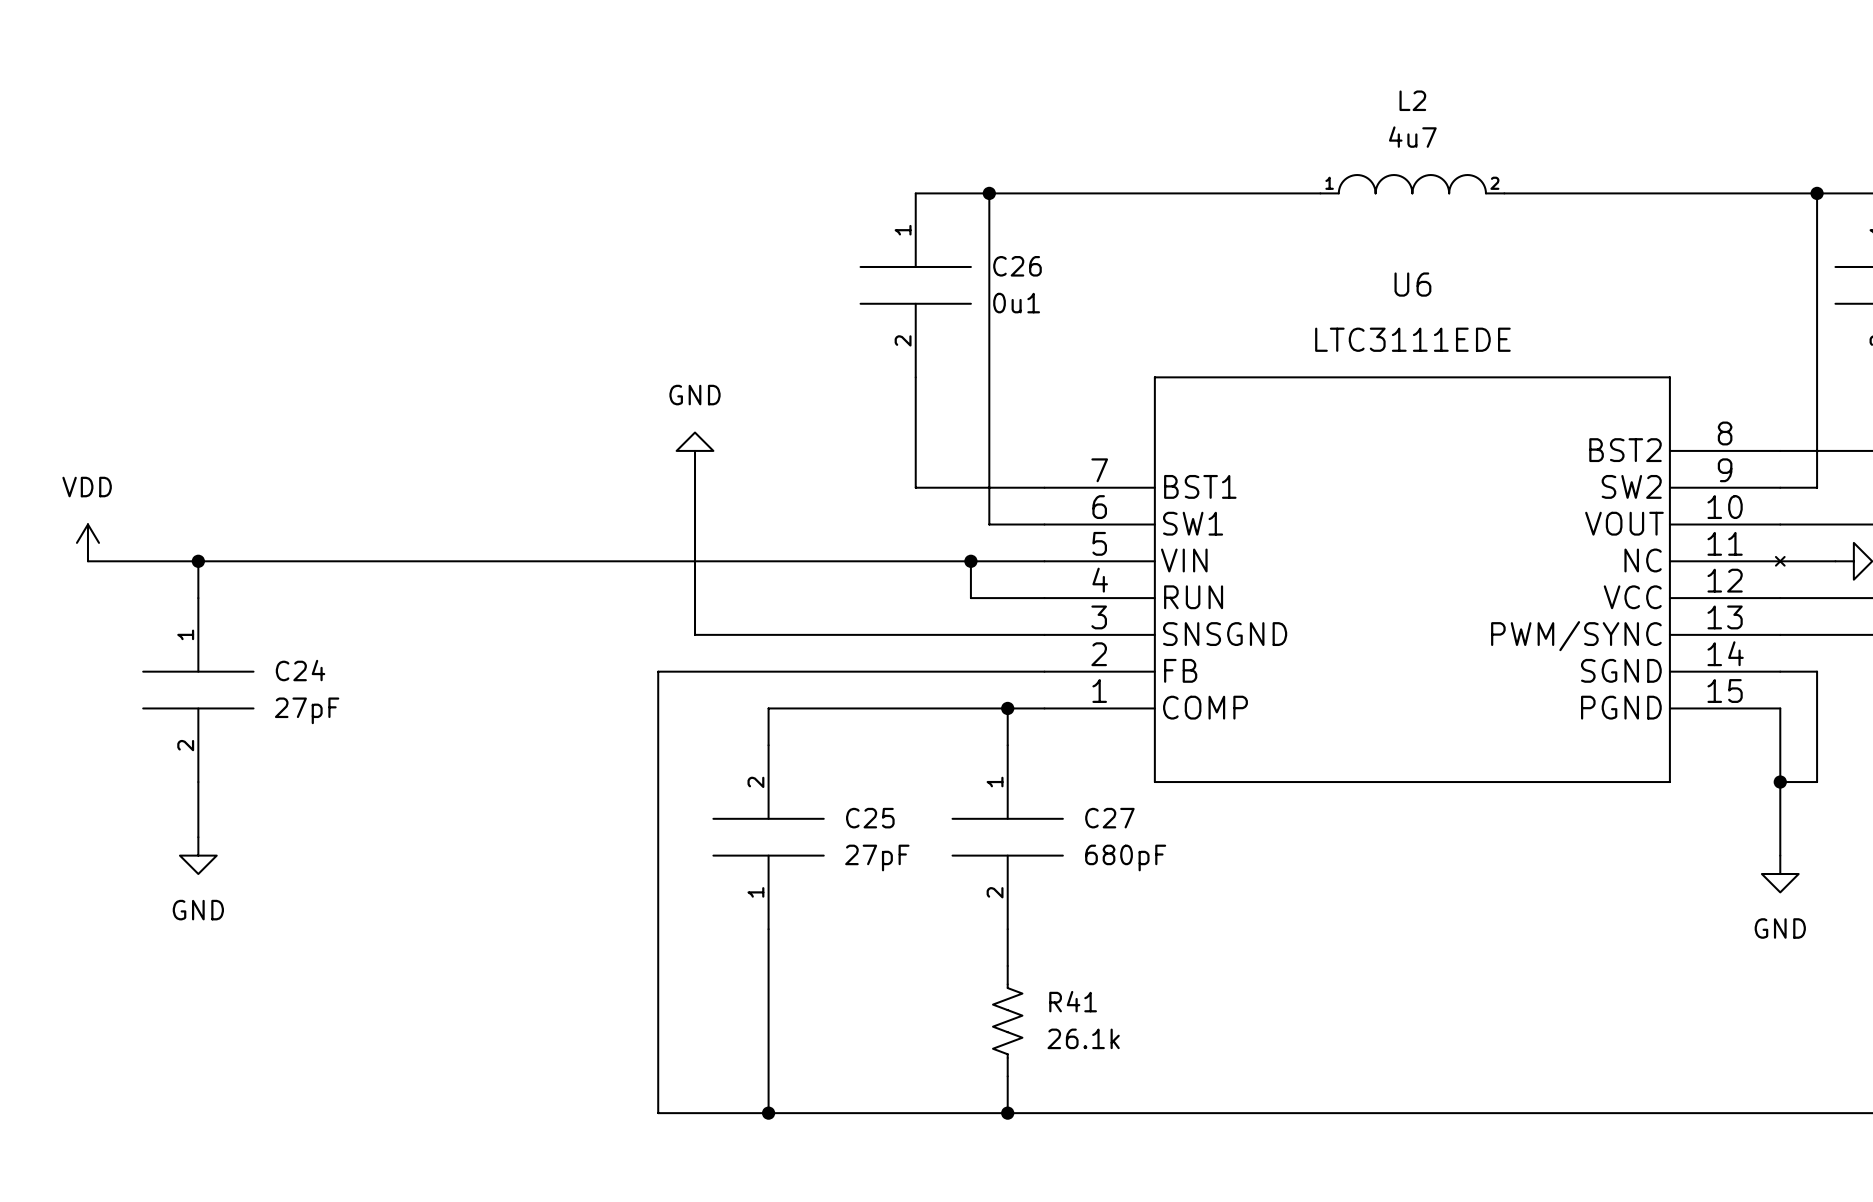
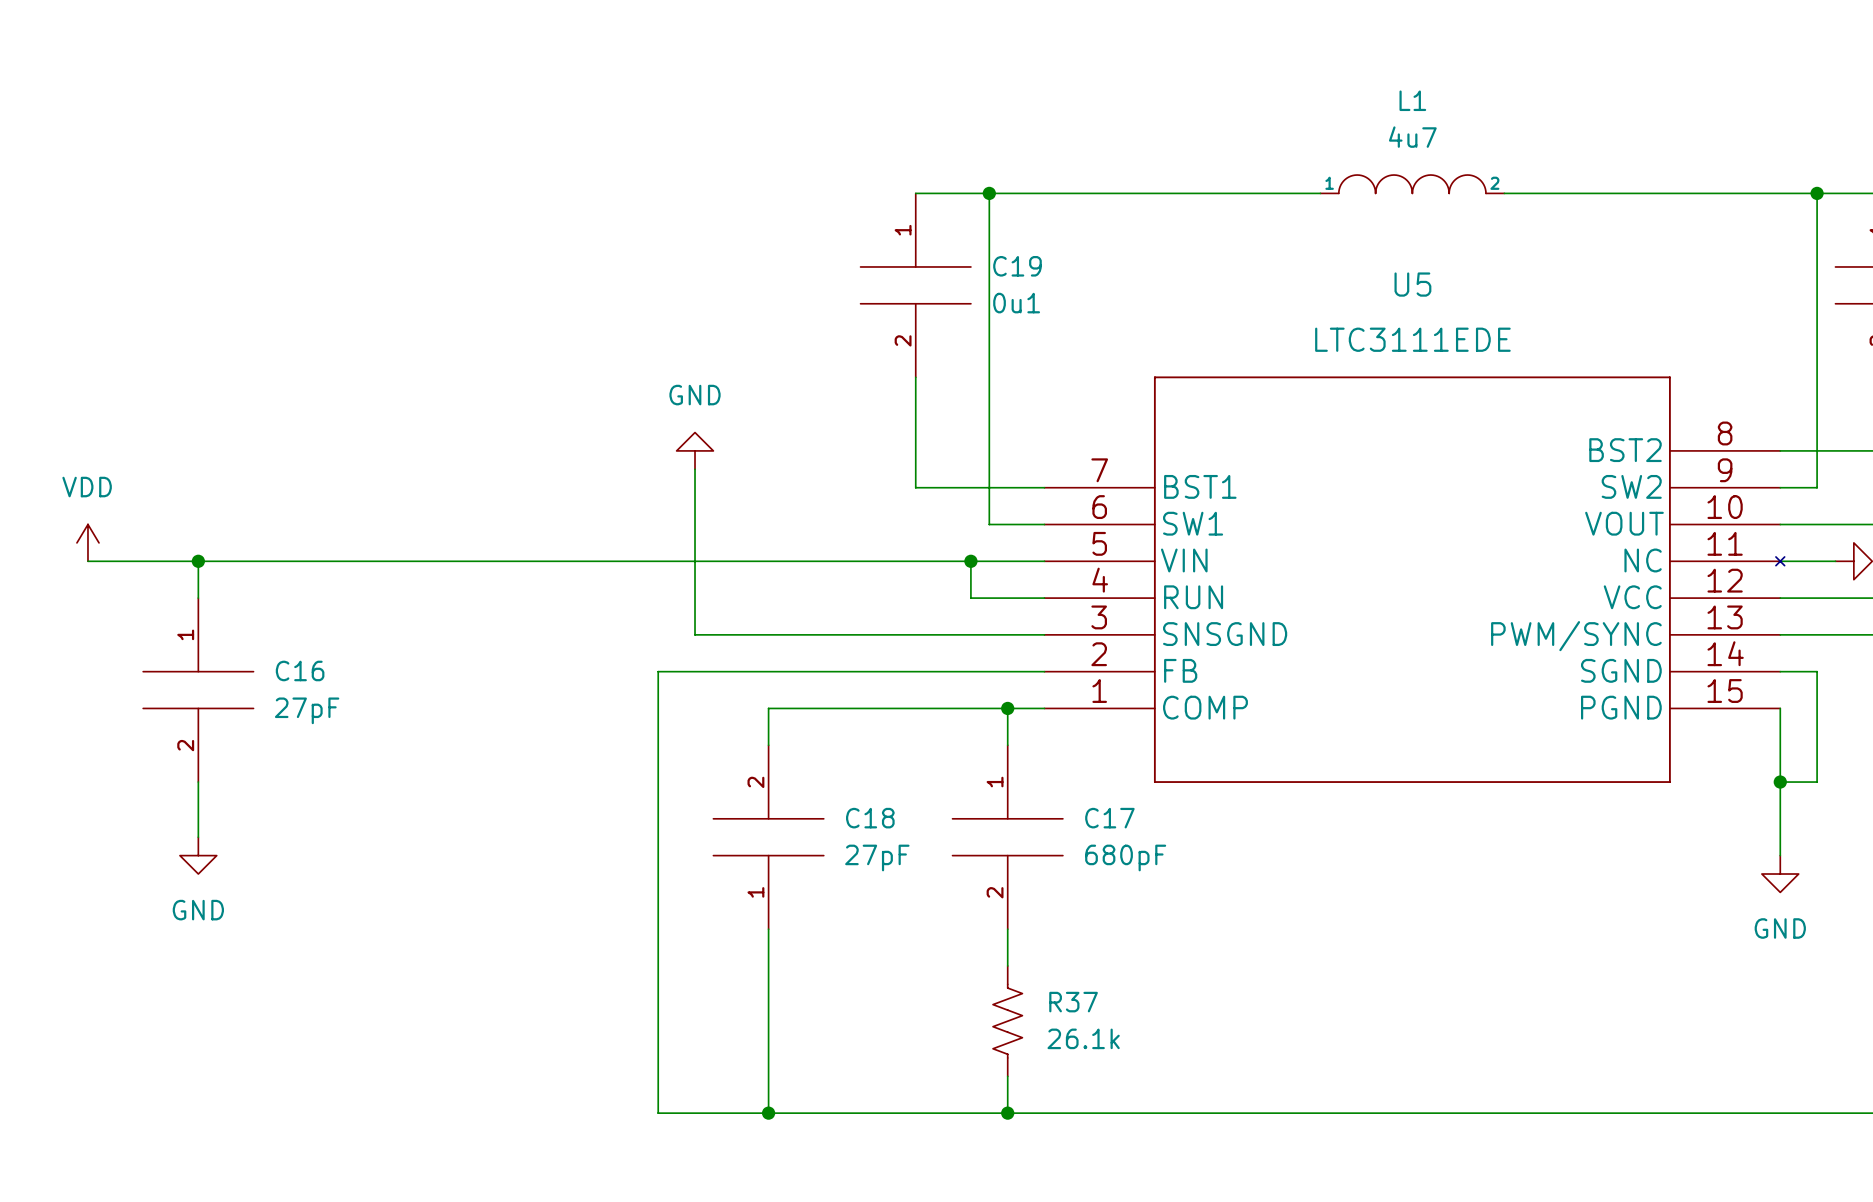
L2 name: L2 (1412, 100) -> L1 (1412, 100)
C26 name: C26 (1017, 266) -> C19 (1017, 266)
U6 name: U6 (1412, 284) -> U5 (1412, 284)
C24 name: C24 (300, 670) -> C16 (300, 670)
C25 name: C25 (870, 818) -> C18 (870, 818)
C27 name: C27 (1109, 818) -> C17 (1109, 818)
R41 name: R41 (1073, 1001) -> R37 (1073, 1002)

